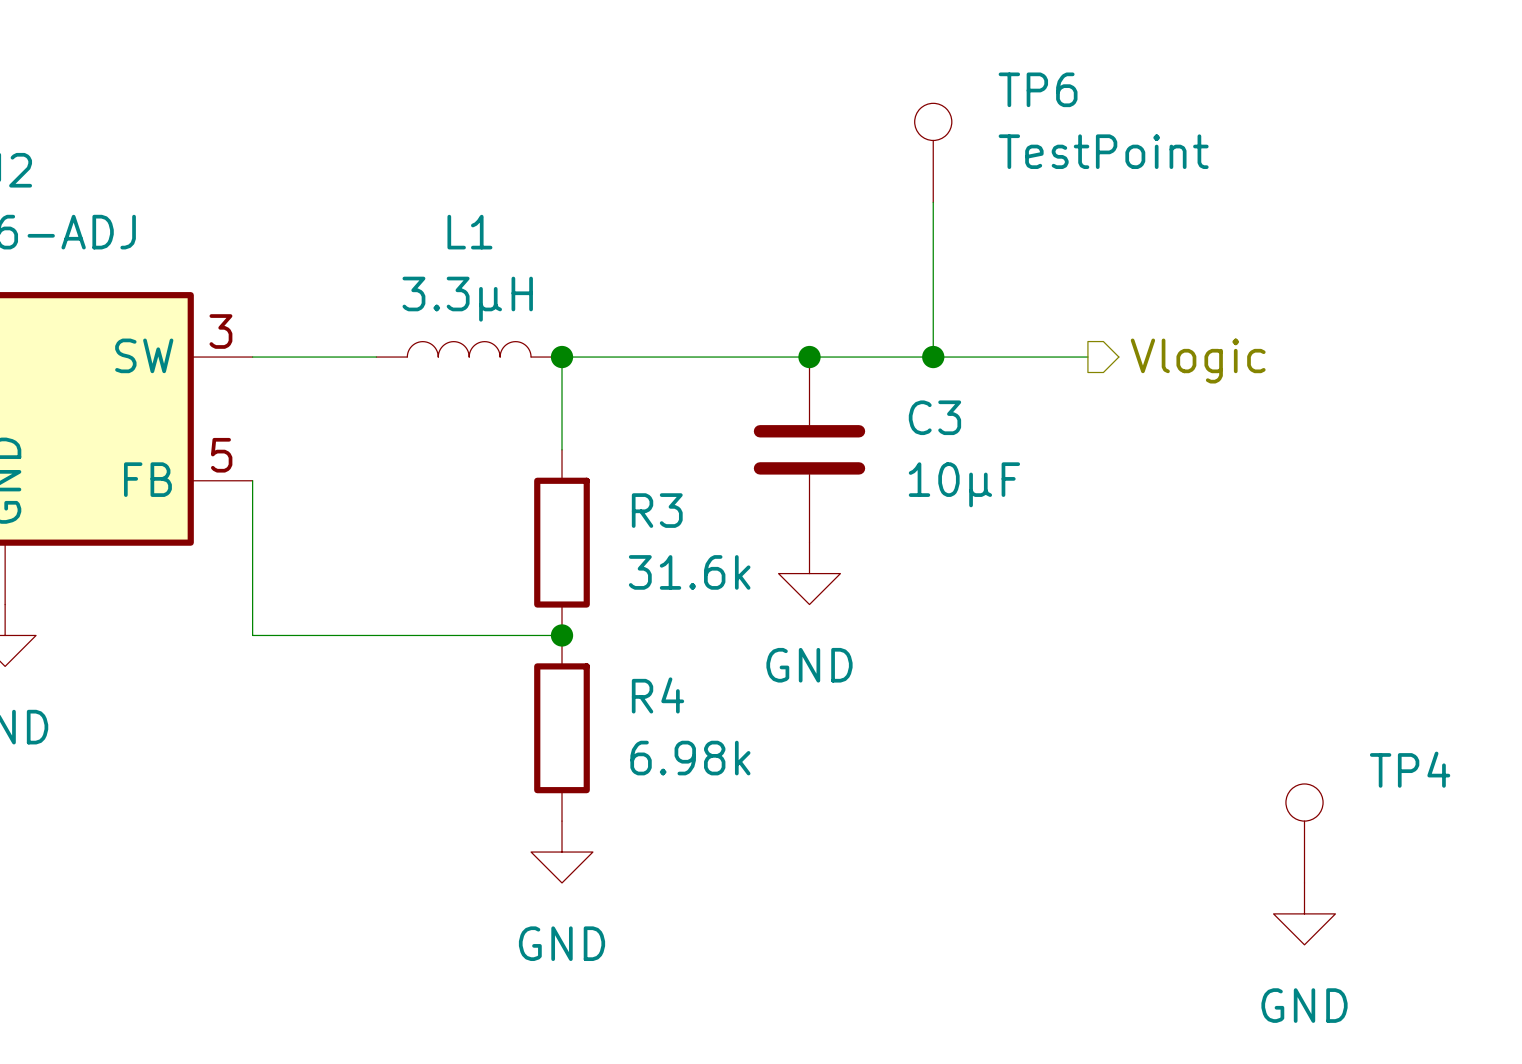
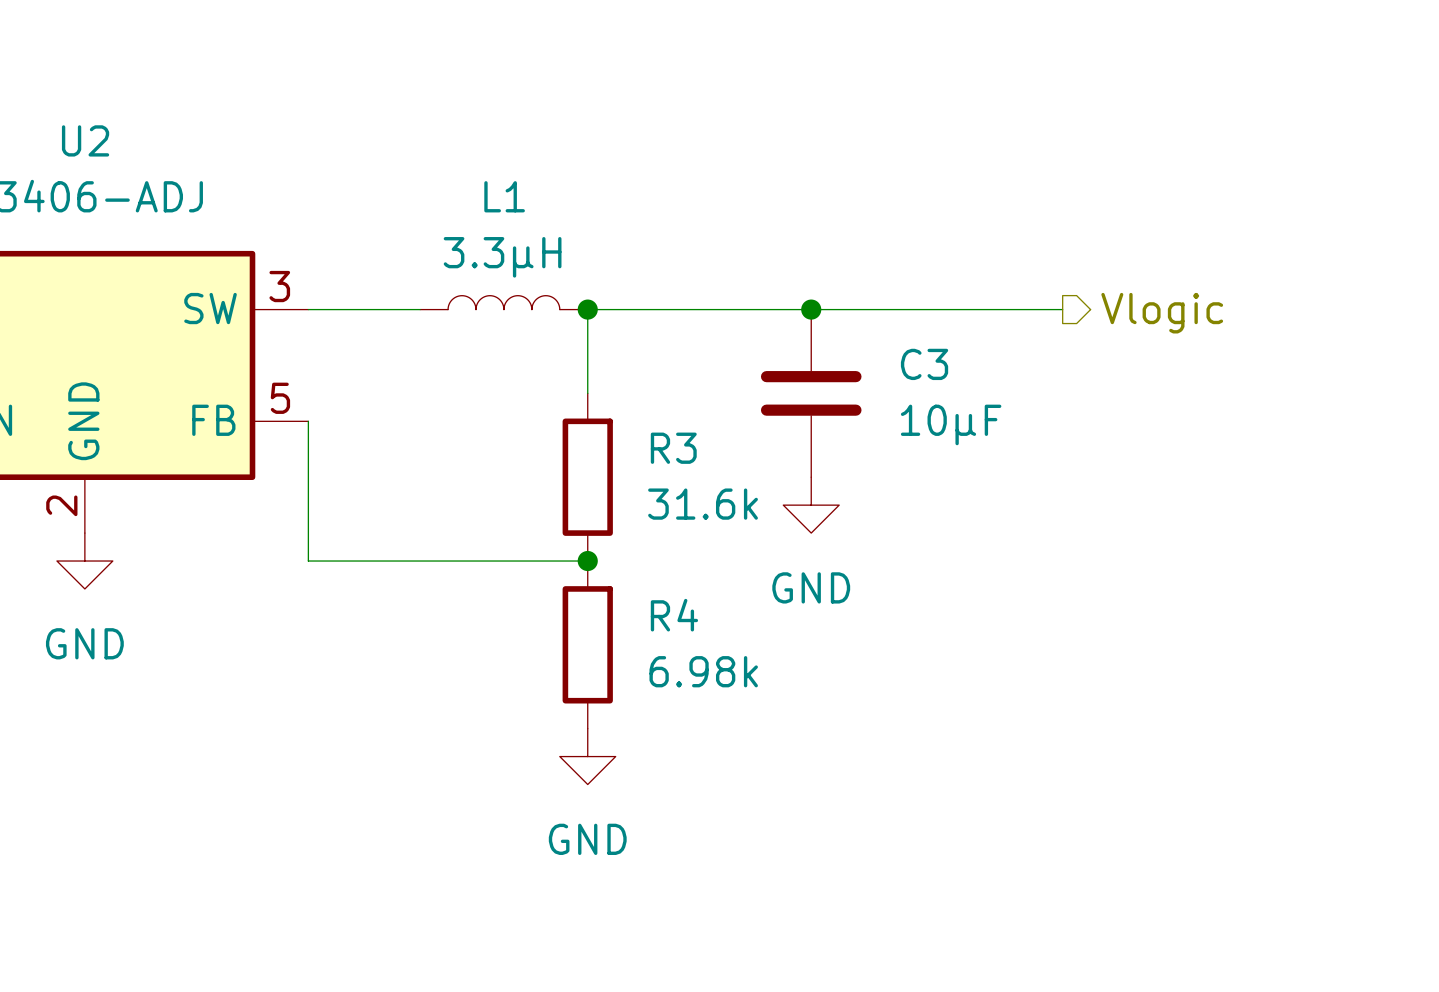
TP6: TestPoint (933, 152) -> none
wire: (933, 202) (933, 357) -> none
junction: (933, 357) -> none
TP4: (1304, 833) -> none
power symbol: GND (1304, 913) -> none

